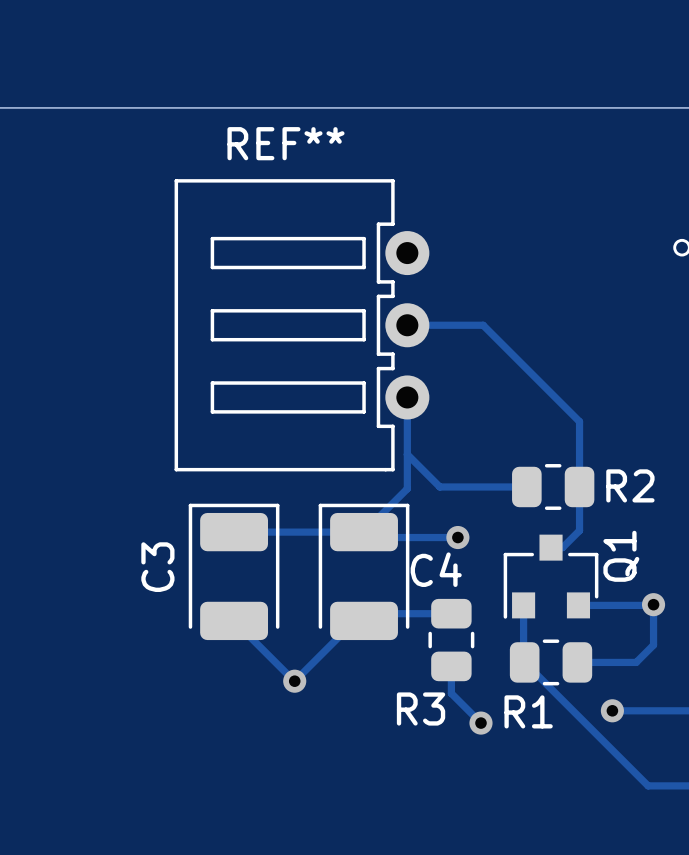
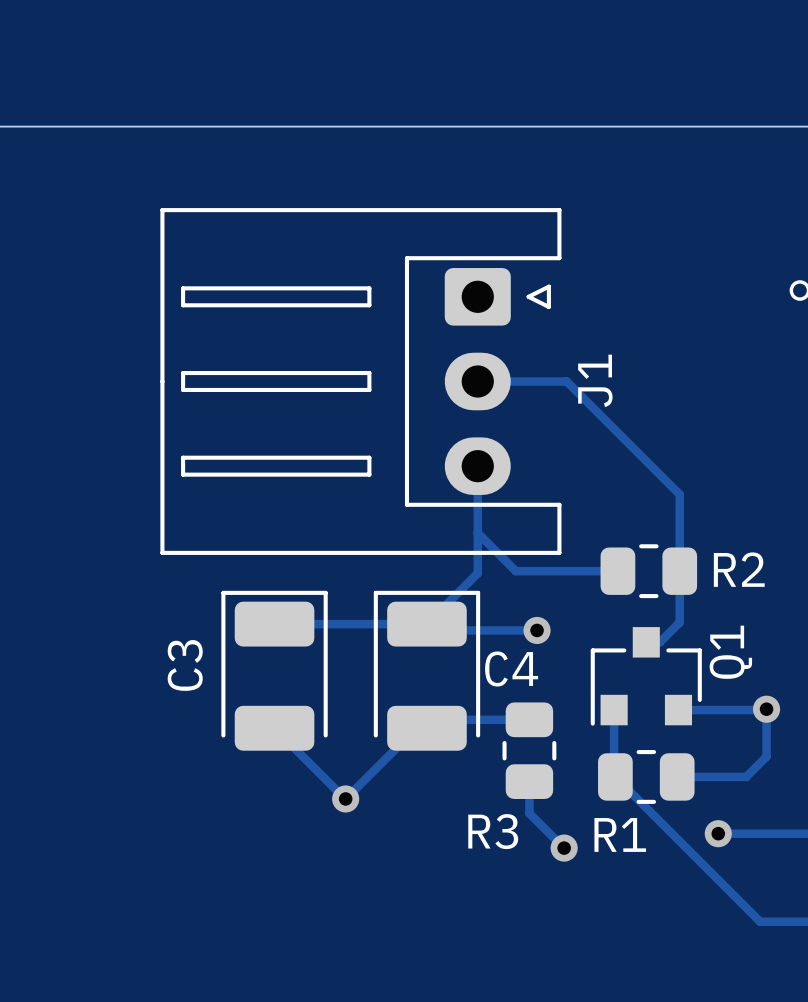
REF**: (301, 325) -> none
J1: none -> (360, 381)

